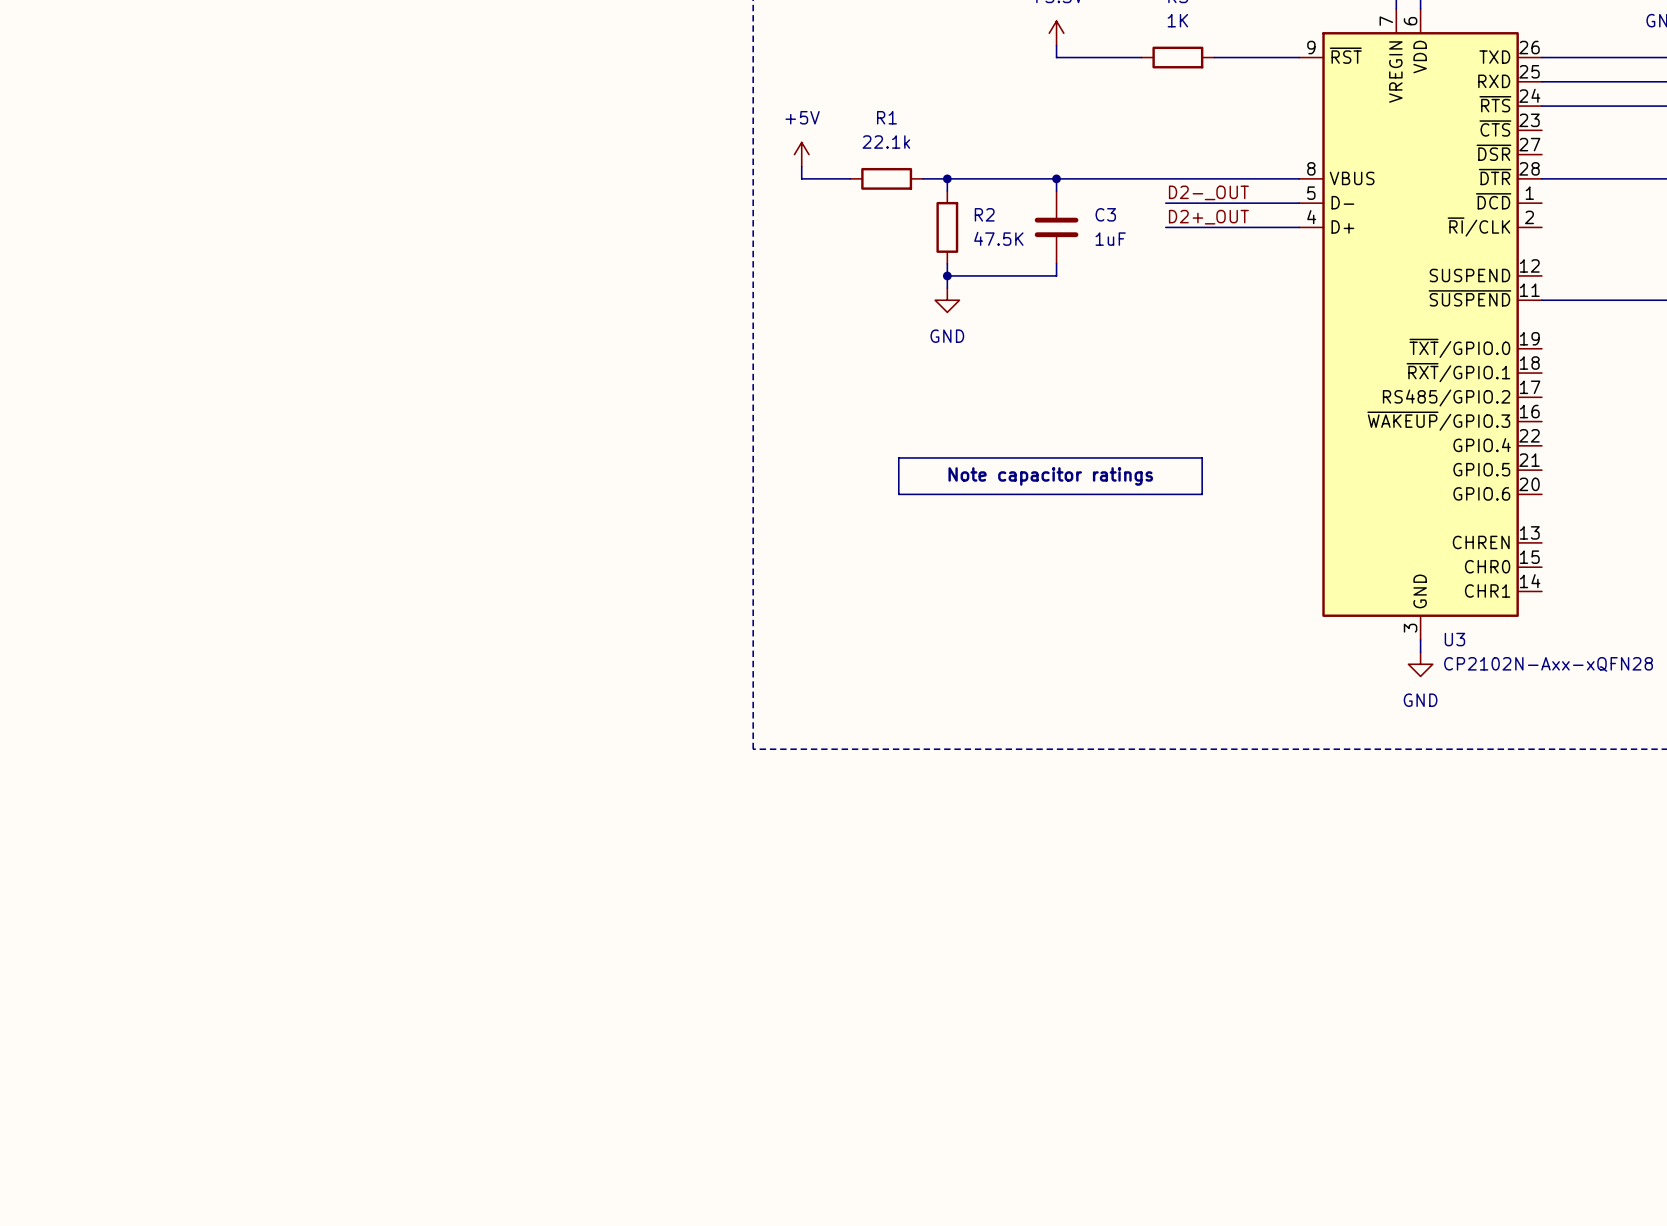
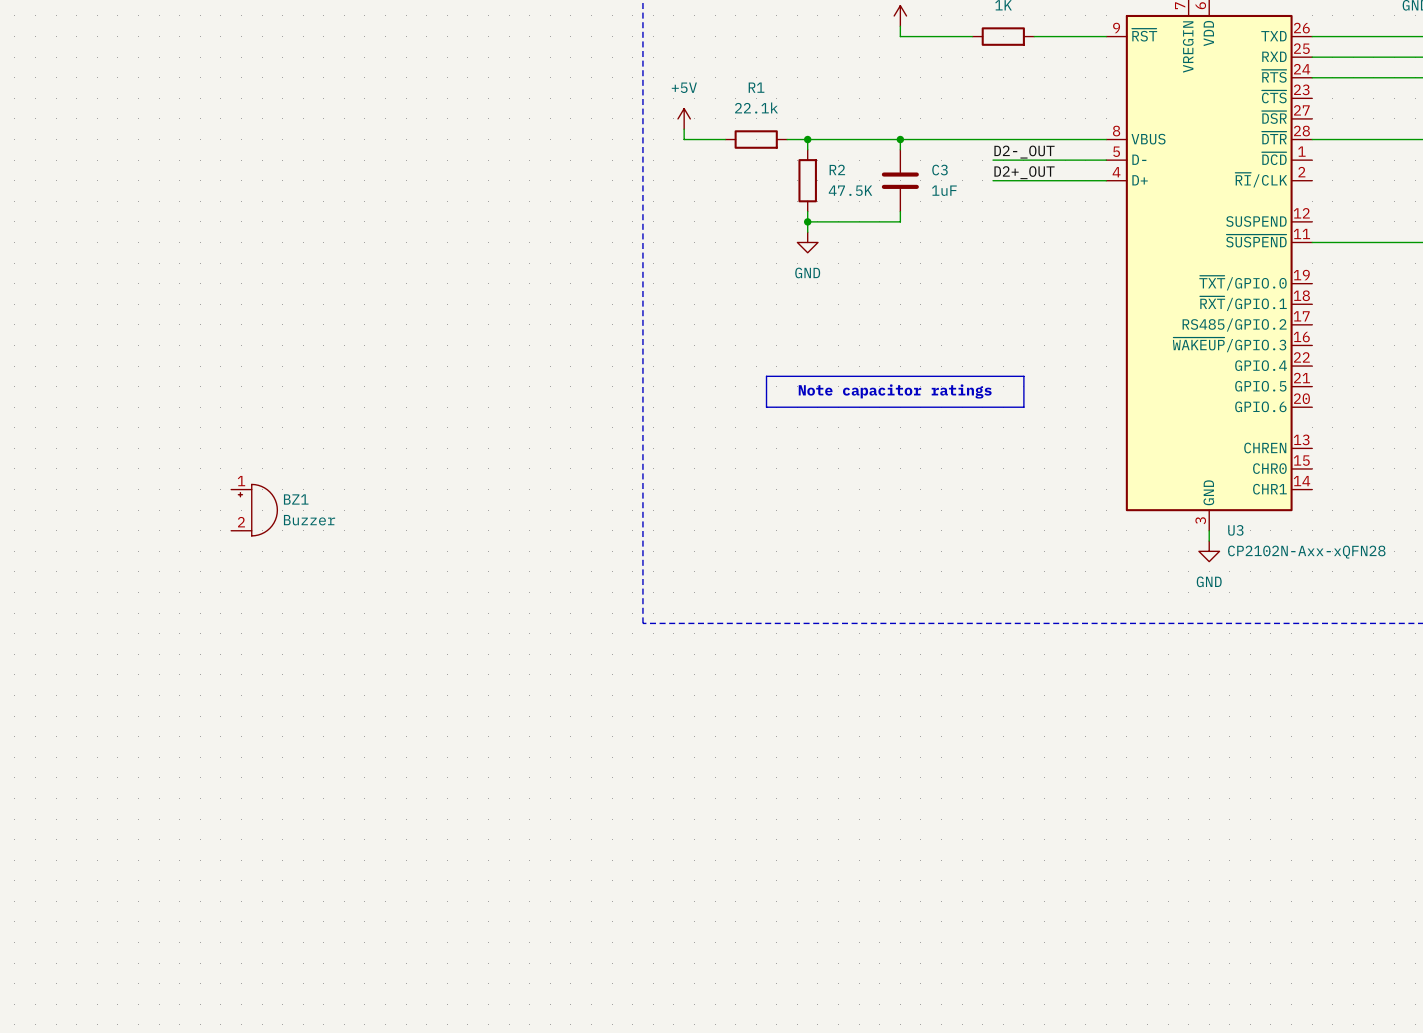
BZ1: none -> Buzzer (254, 510)

